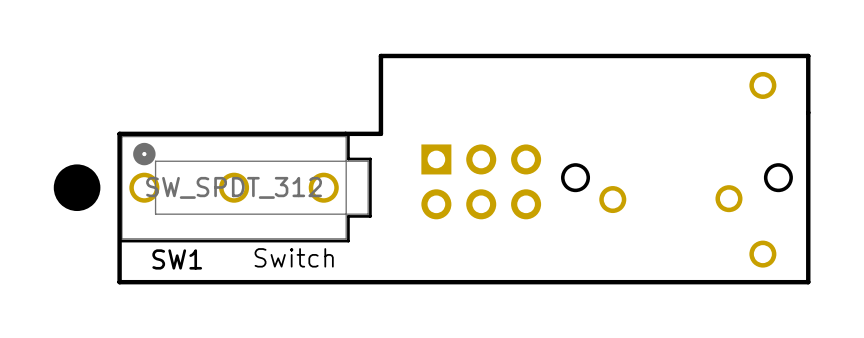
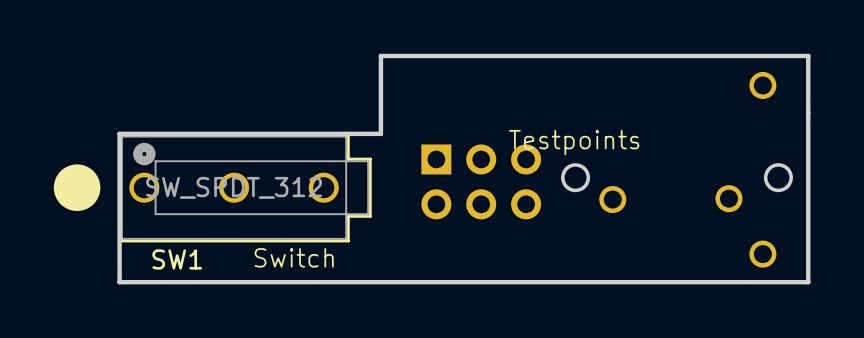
text: none -> Testpoints (574, 142)

